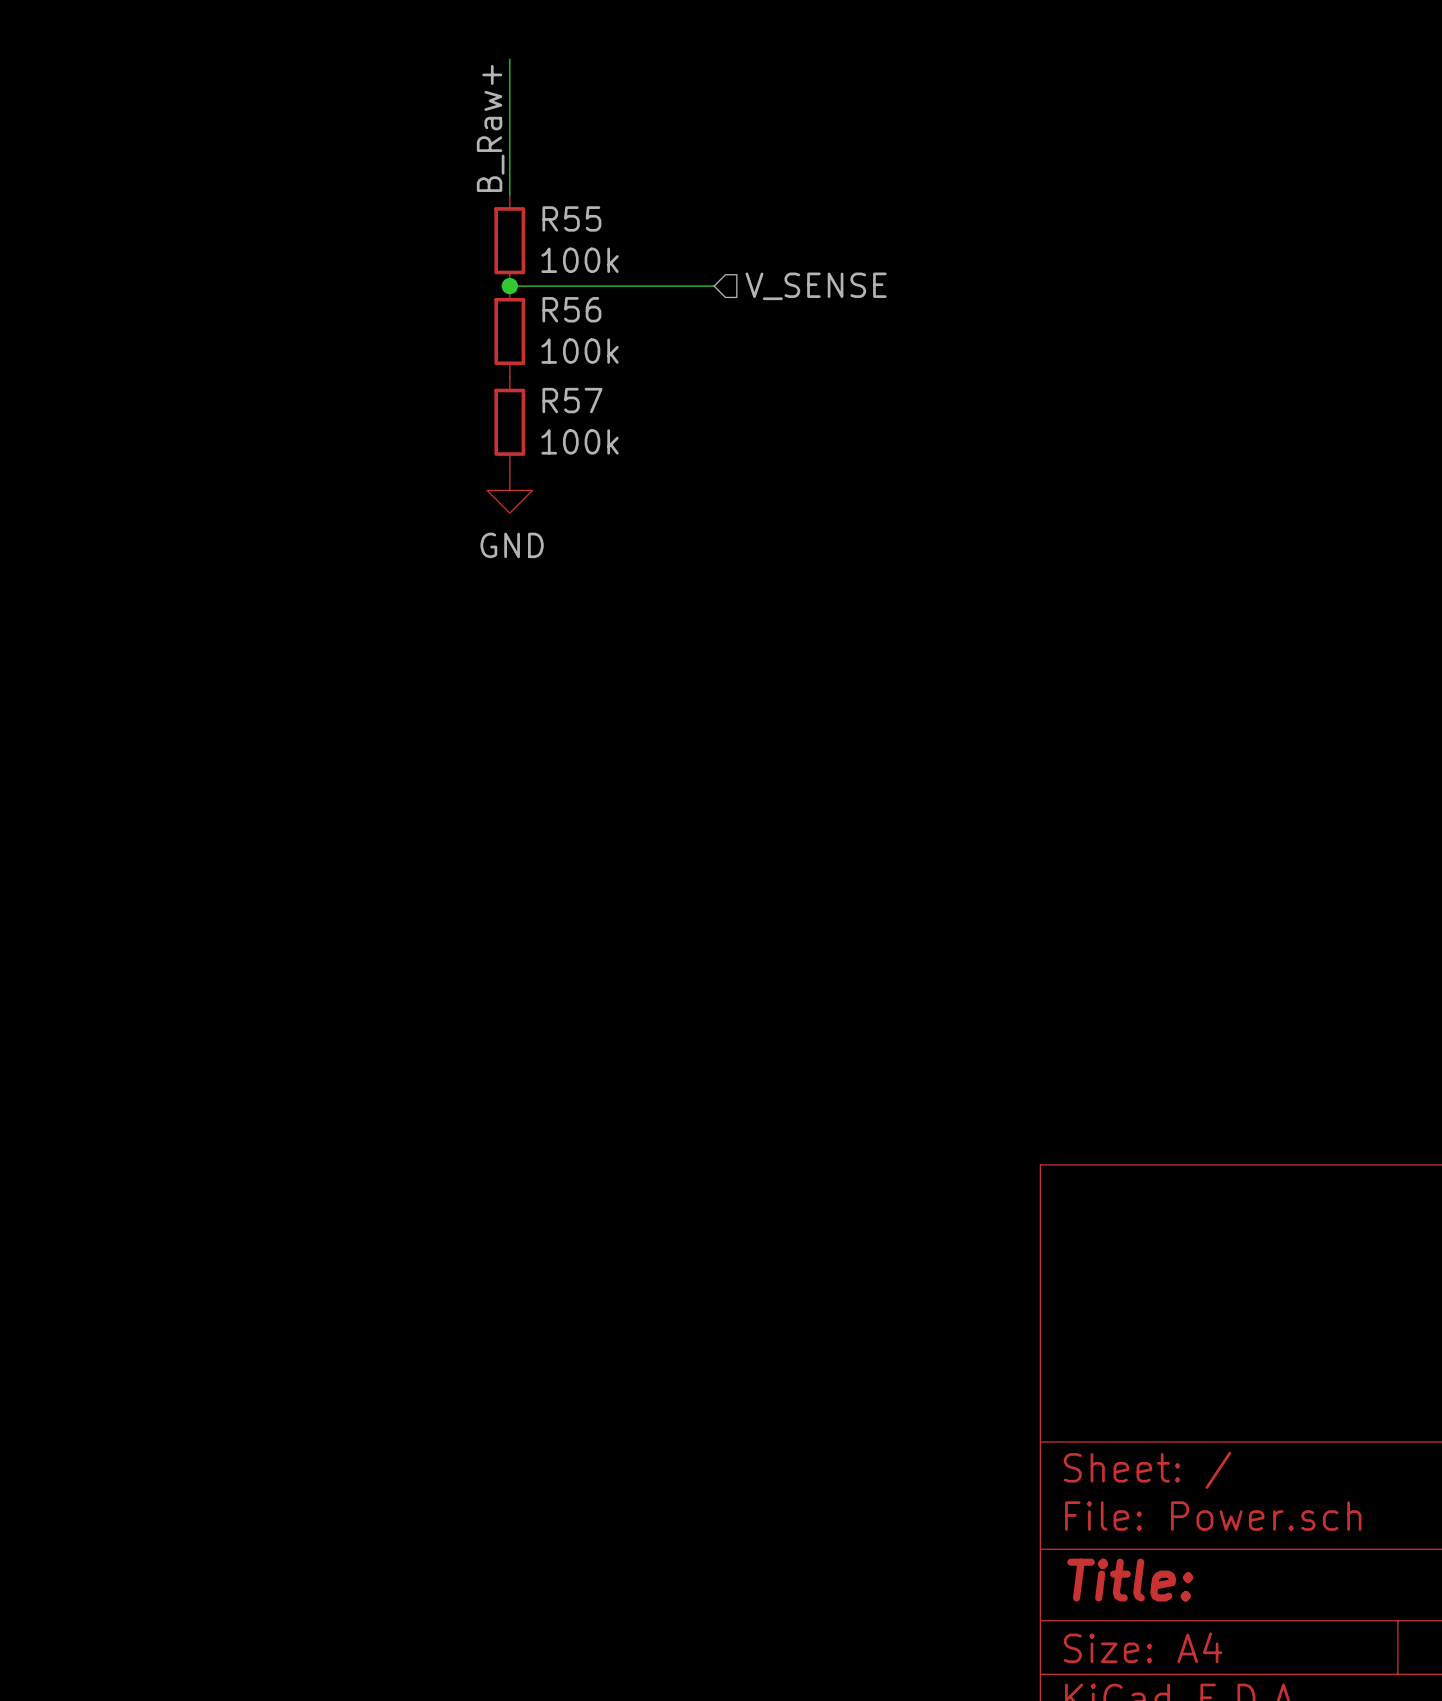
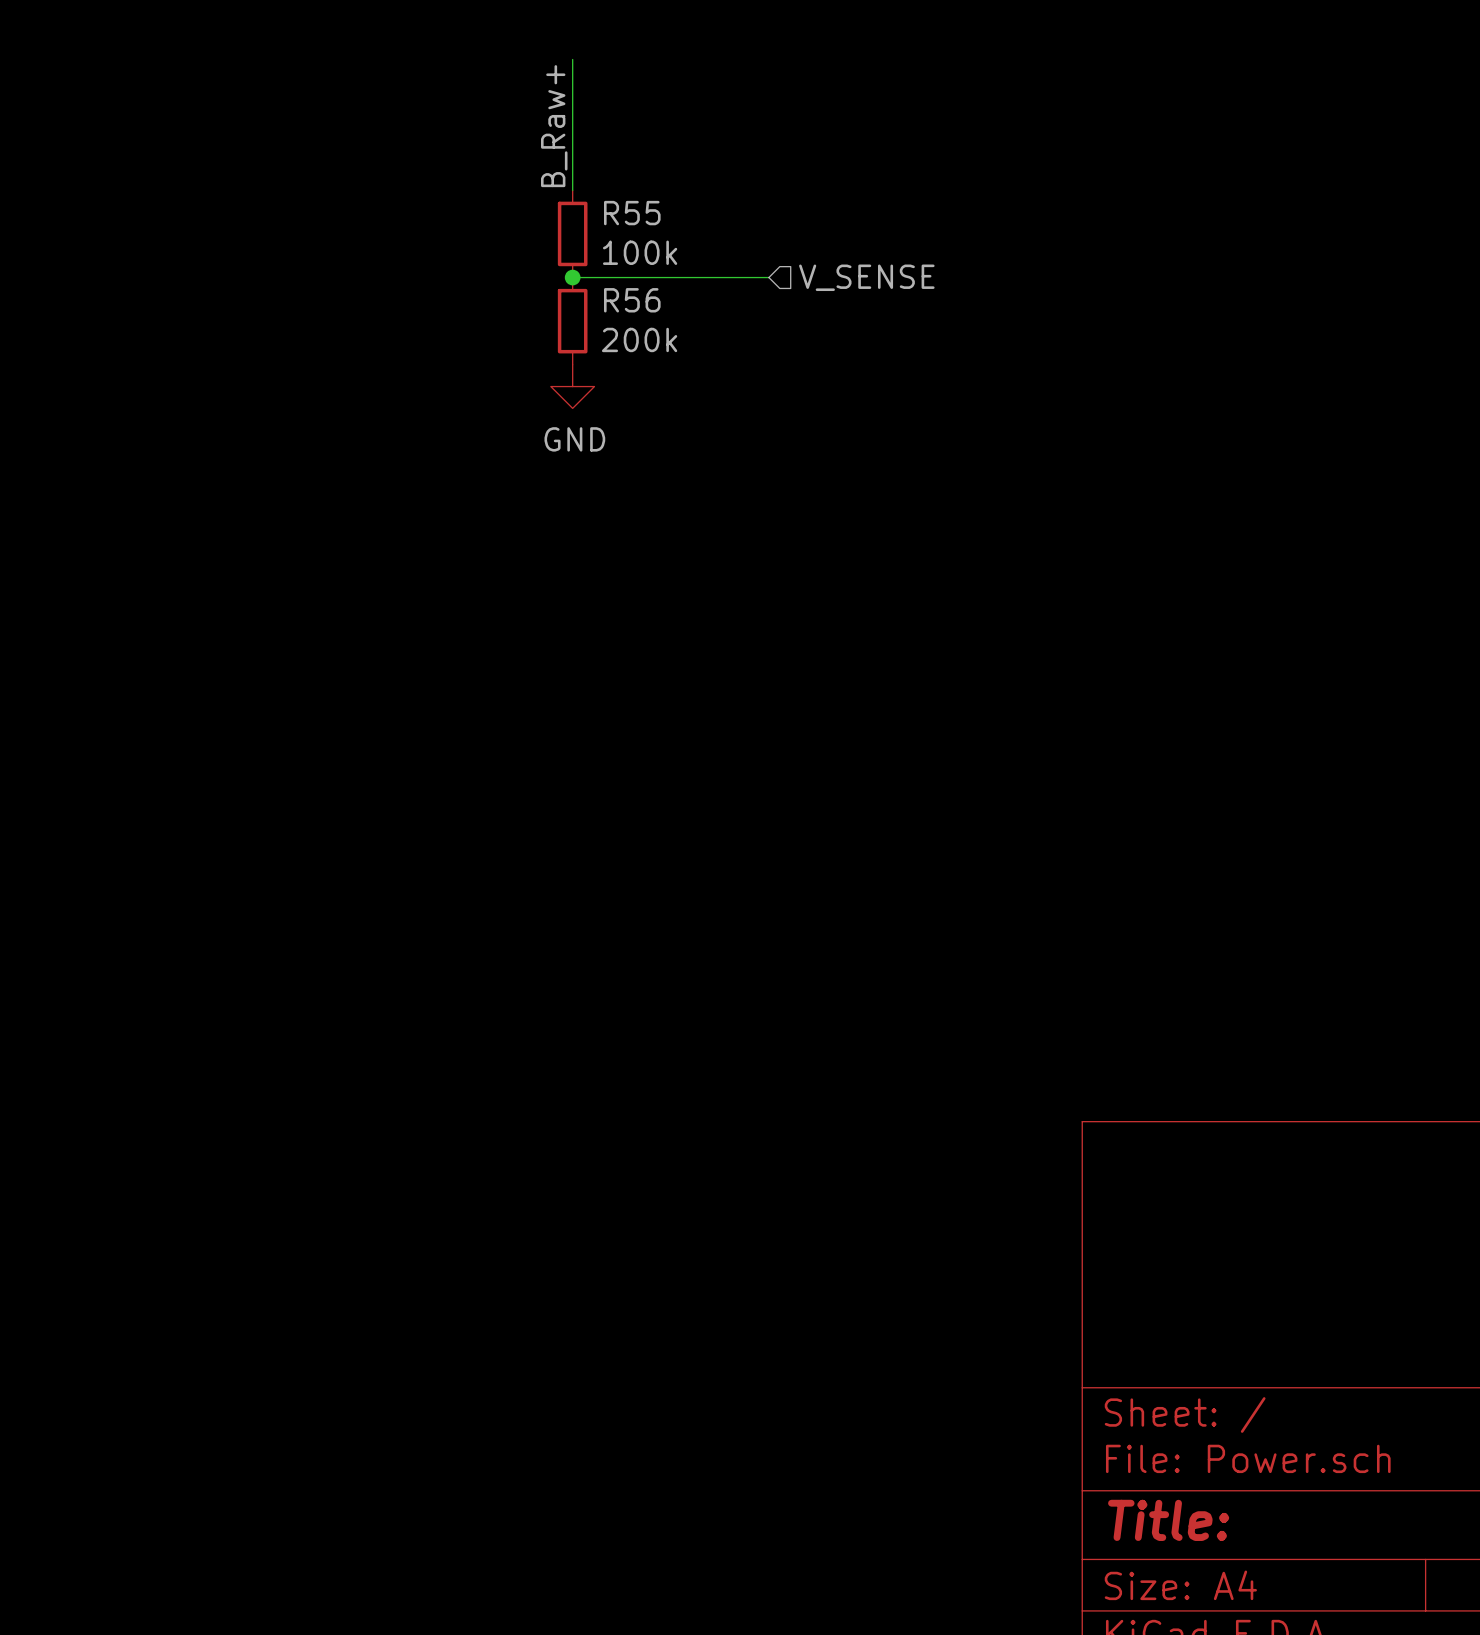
R56 value: 100k (580, 351) -> 200k (639, 339)
R57: 100k (509, 422) -> none
power symbol position: GND (509, 490) -> GND (572, 386)

